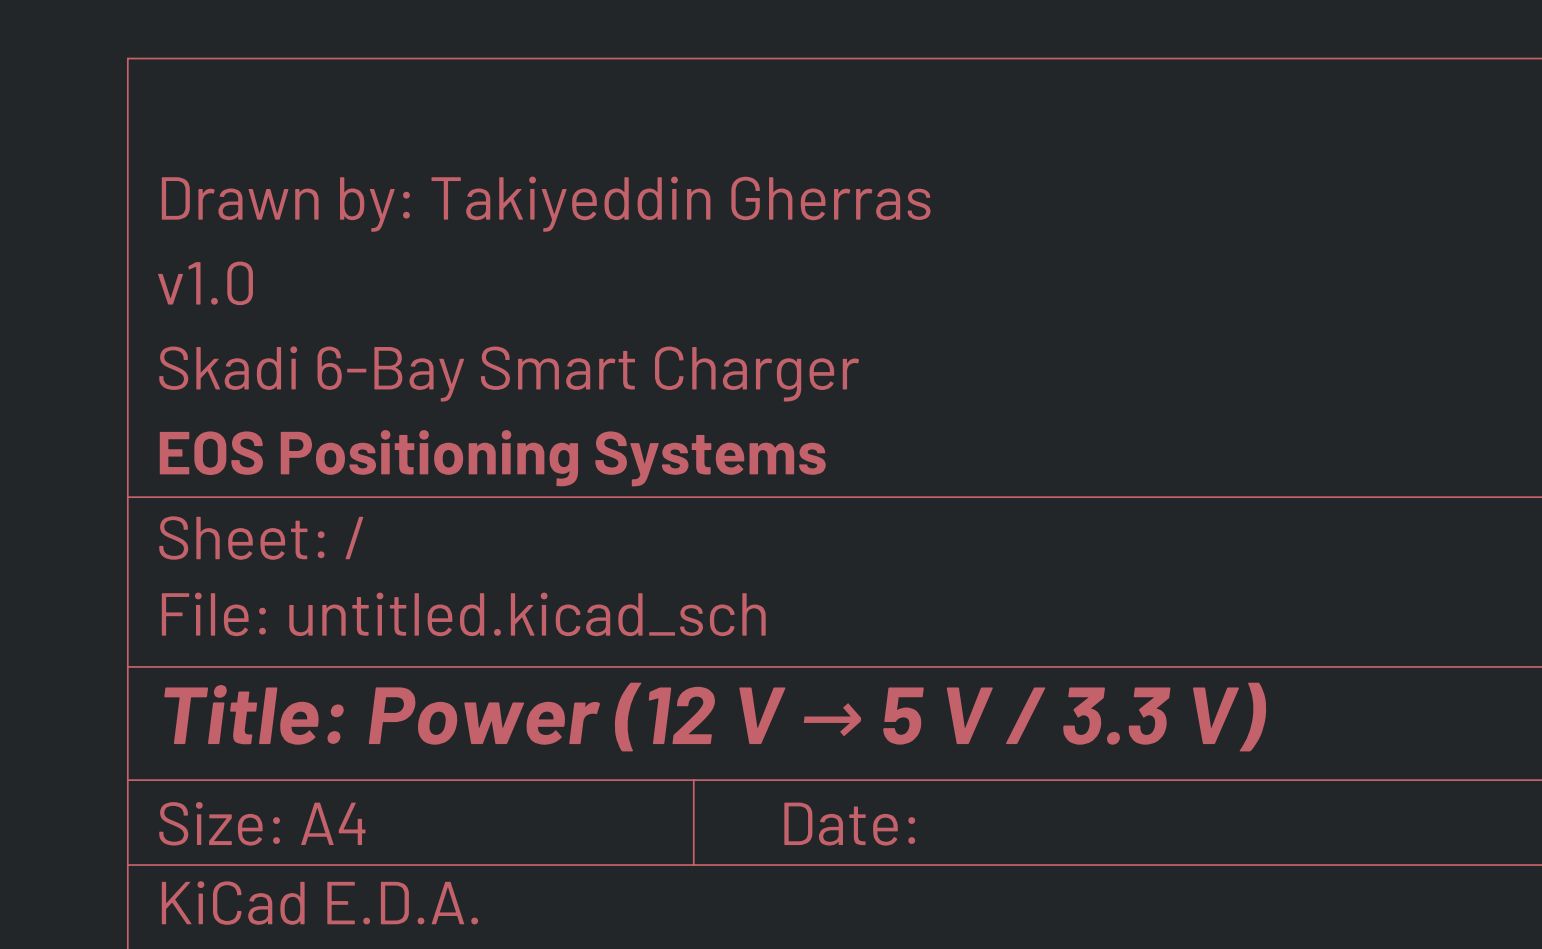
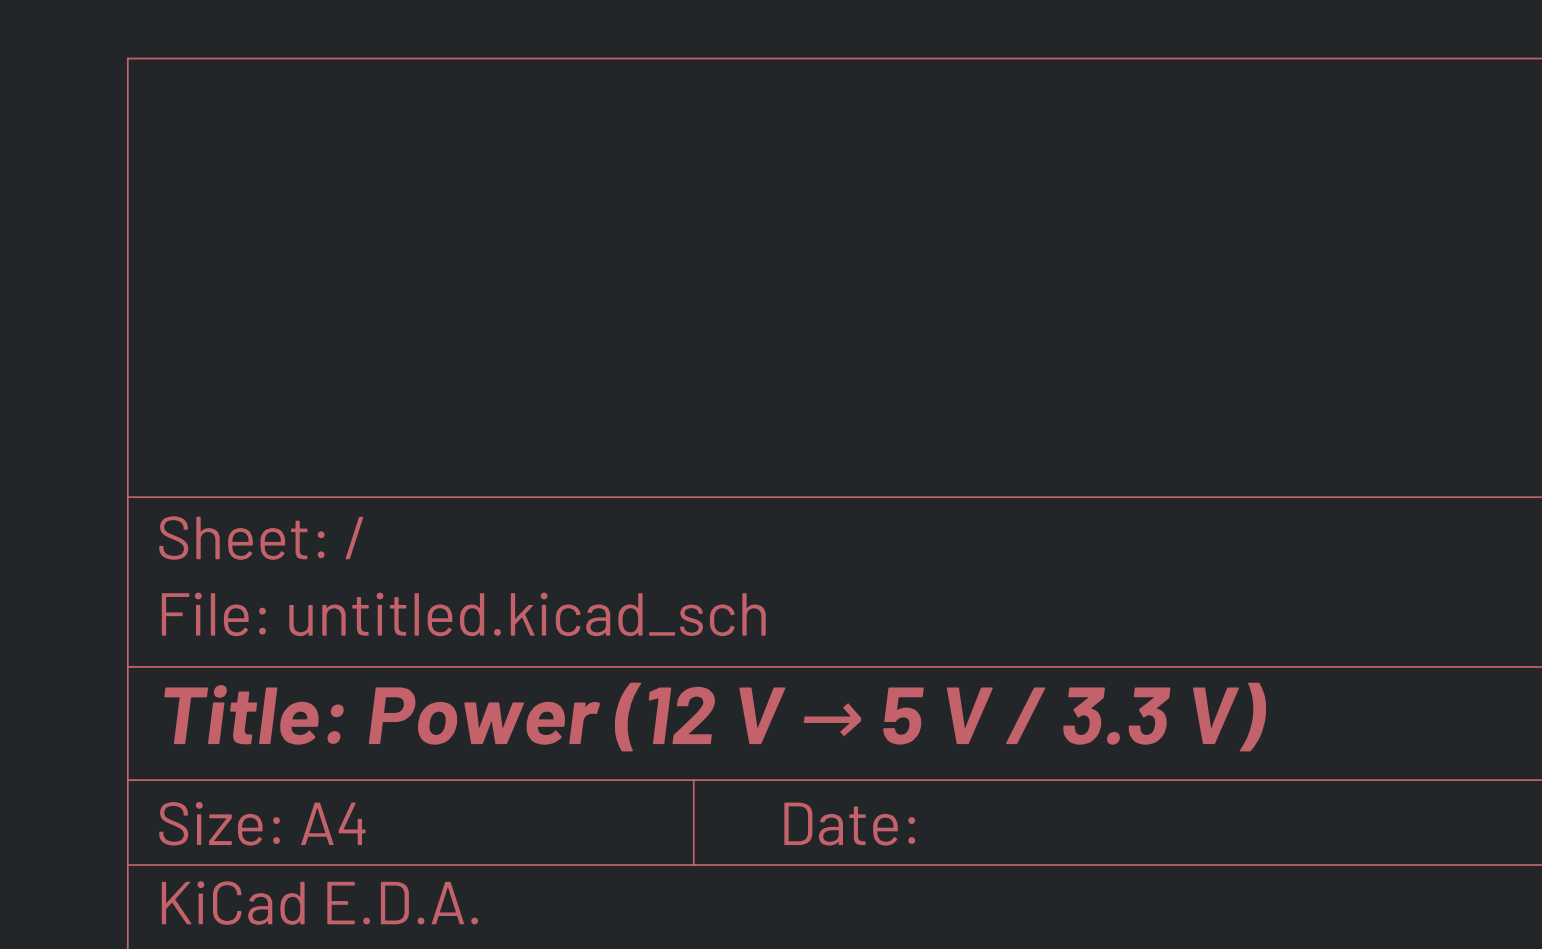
title block: Drawn by: Takiyeddin Gherras (546, 204) -> none
title block: v1.0 (205, 283) -> none
title block: Skadi 6-Bay Smart Charger (509, 373) -> none
title block: EOS Positioning Systems (492, 458) -> none

